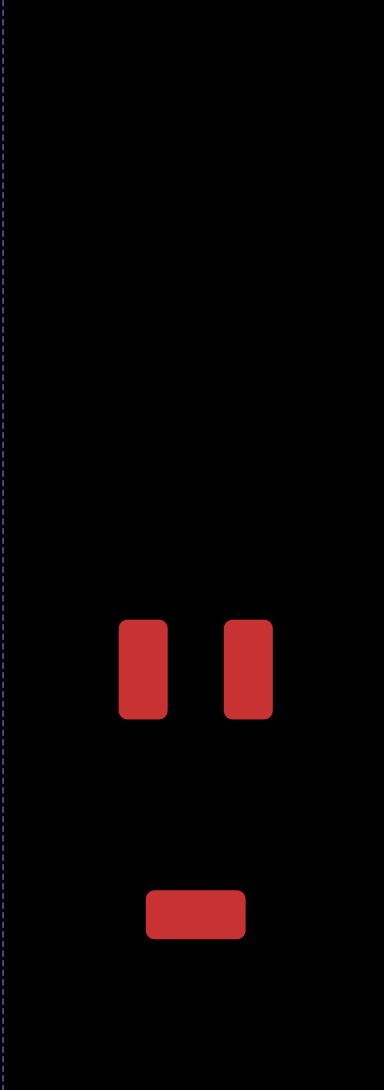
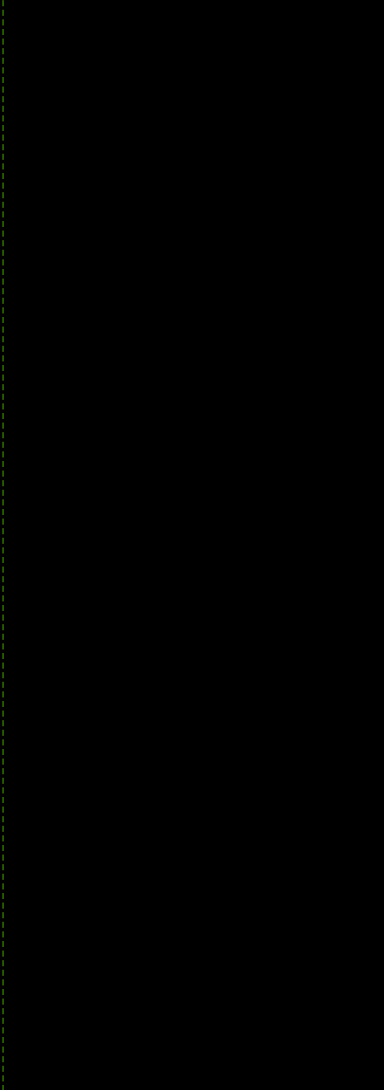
part: (143, 669) -> none
part: (248, 669) -> none
part: (195, 914) -> none

